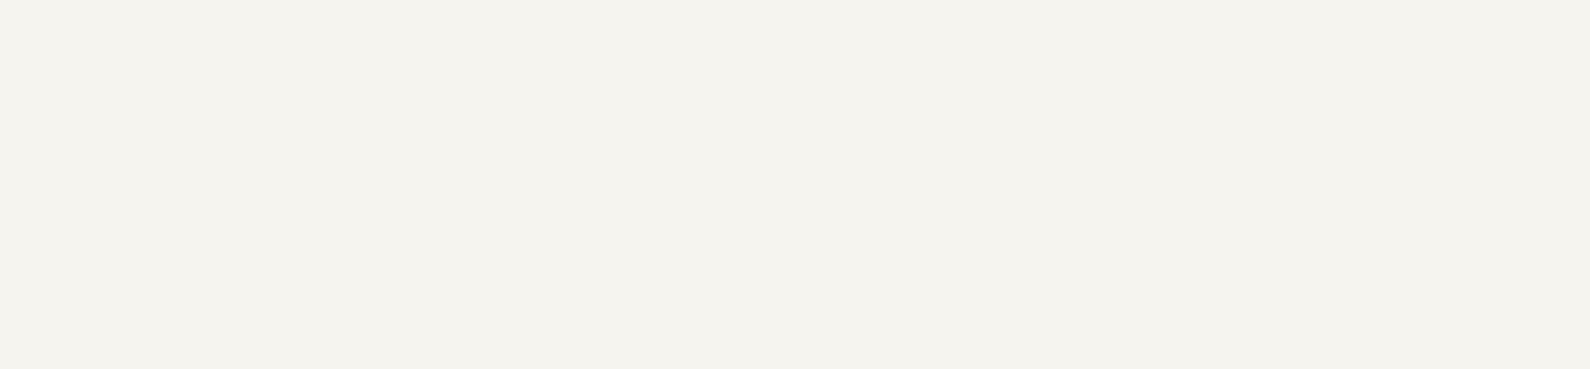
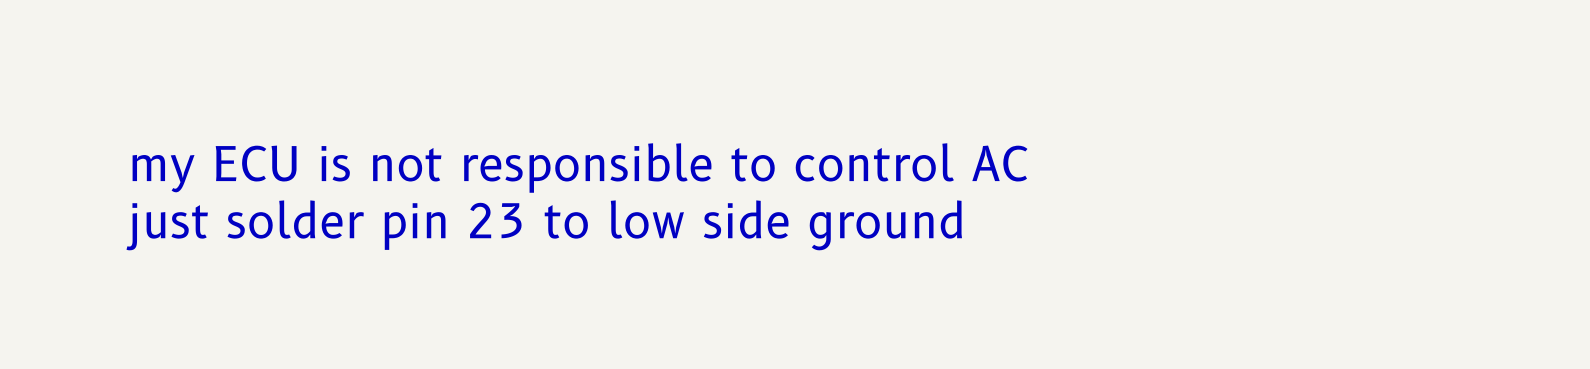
text: none -> my ECU is not responsible to control AC (580, 168)
text: none -> just solder pin 23 to low side ground (544, 225)

